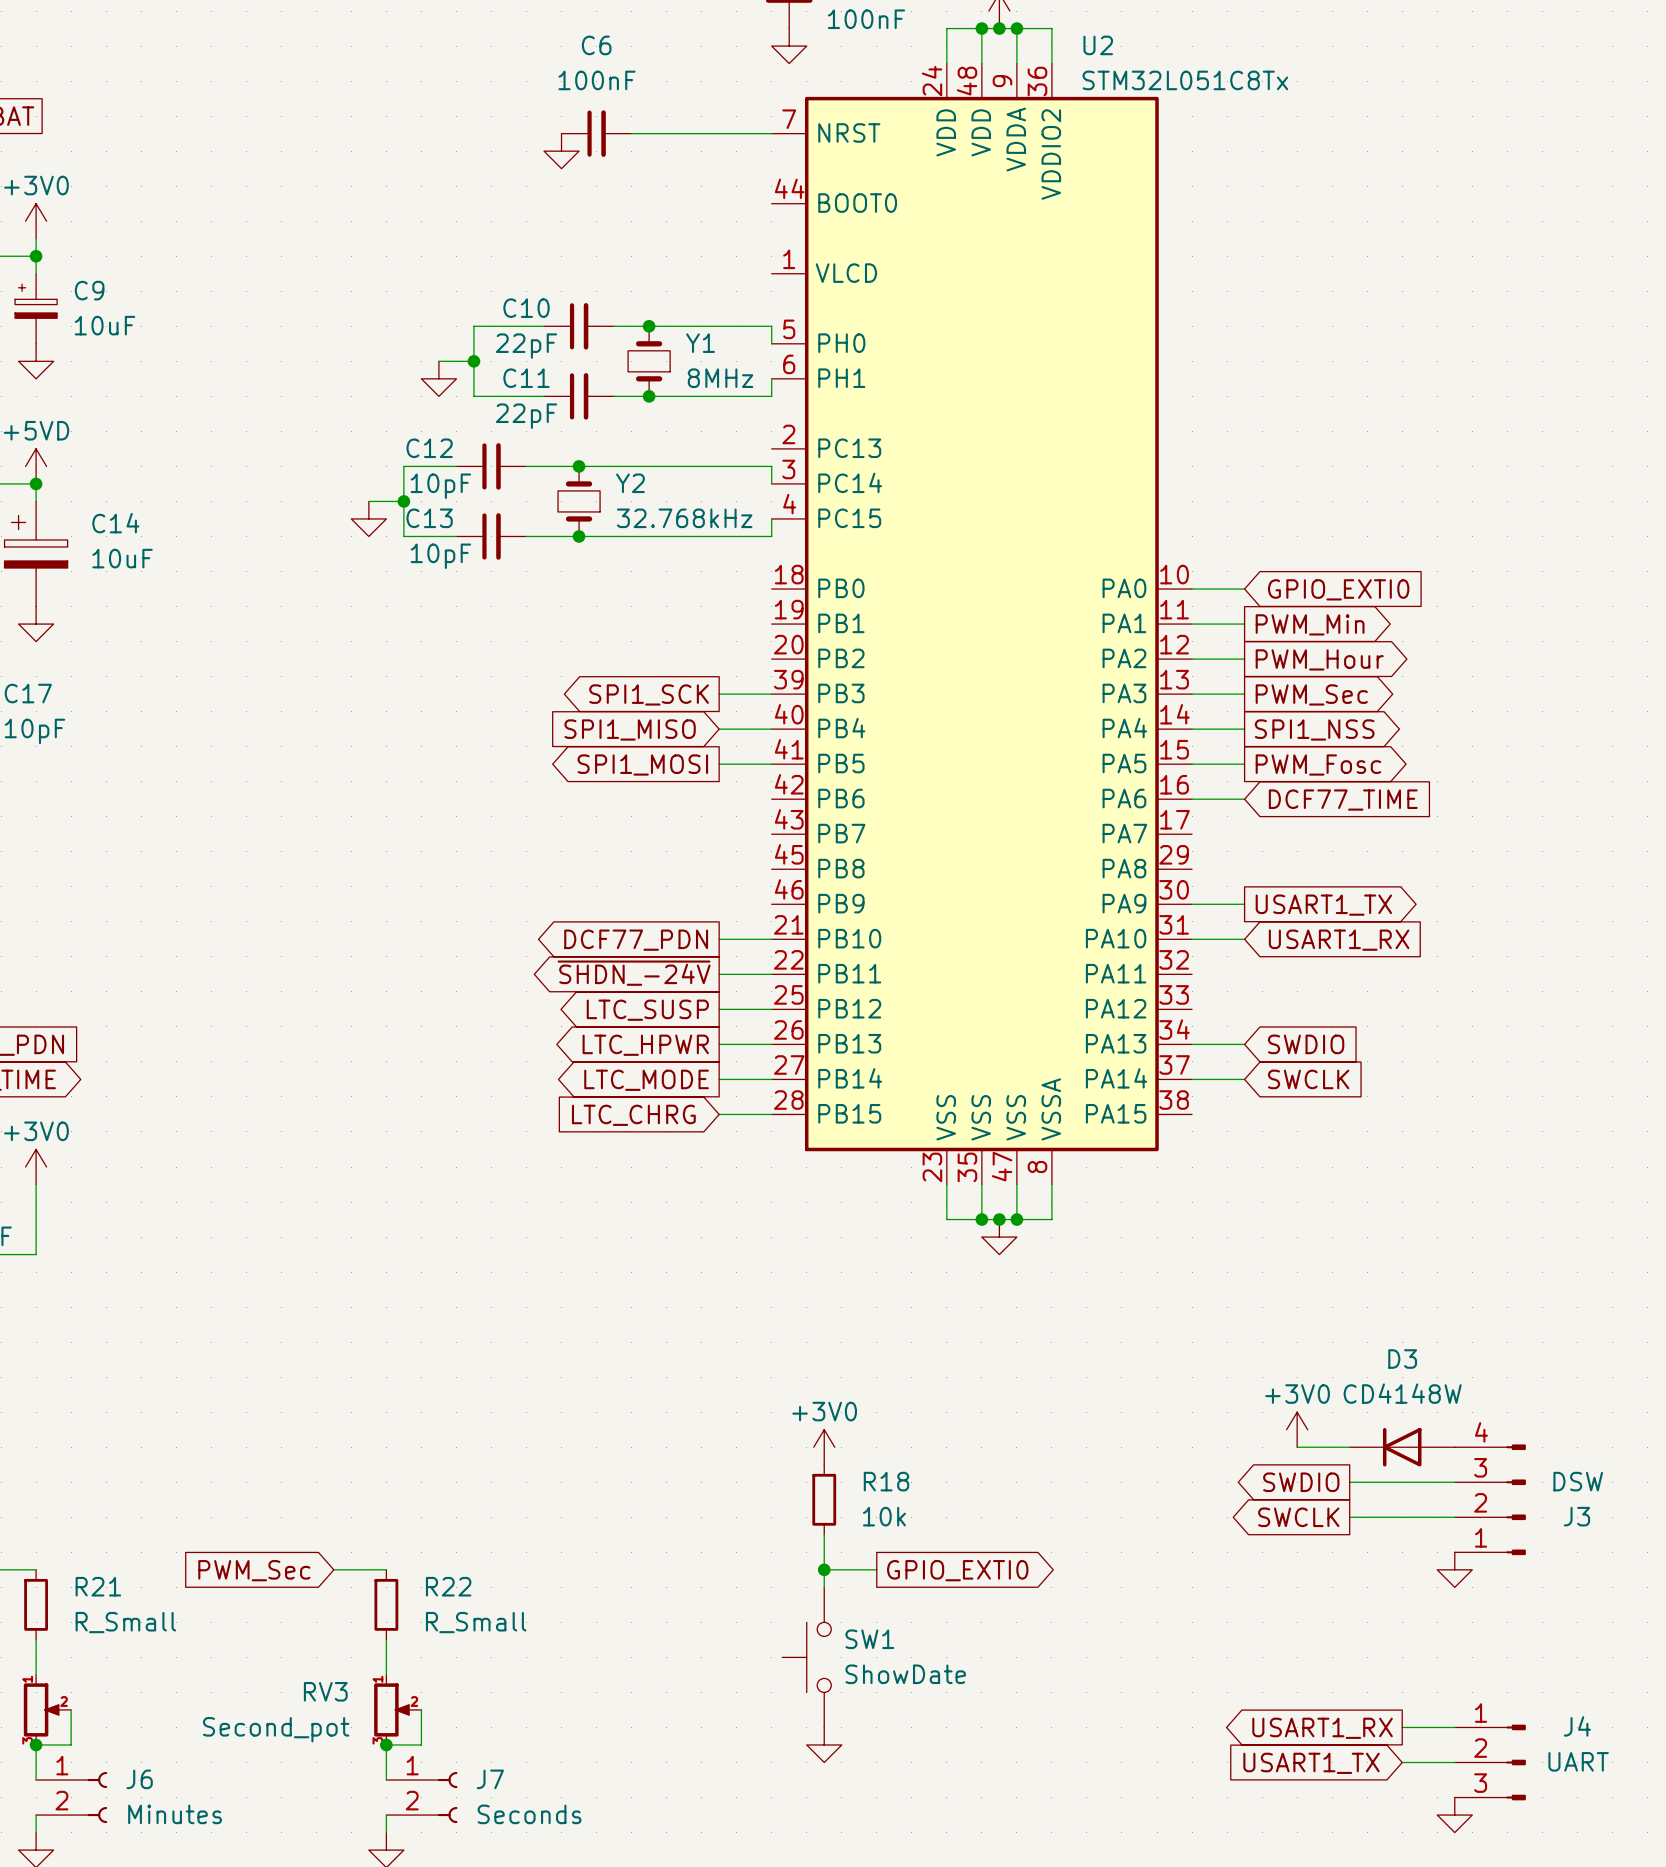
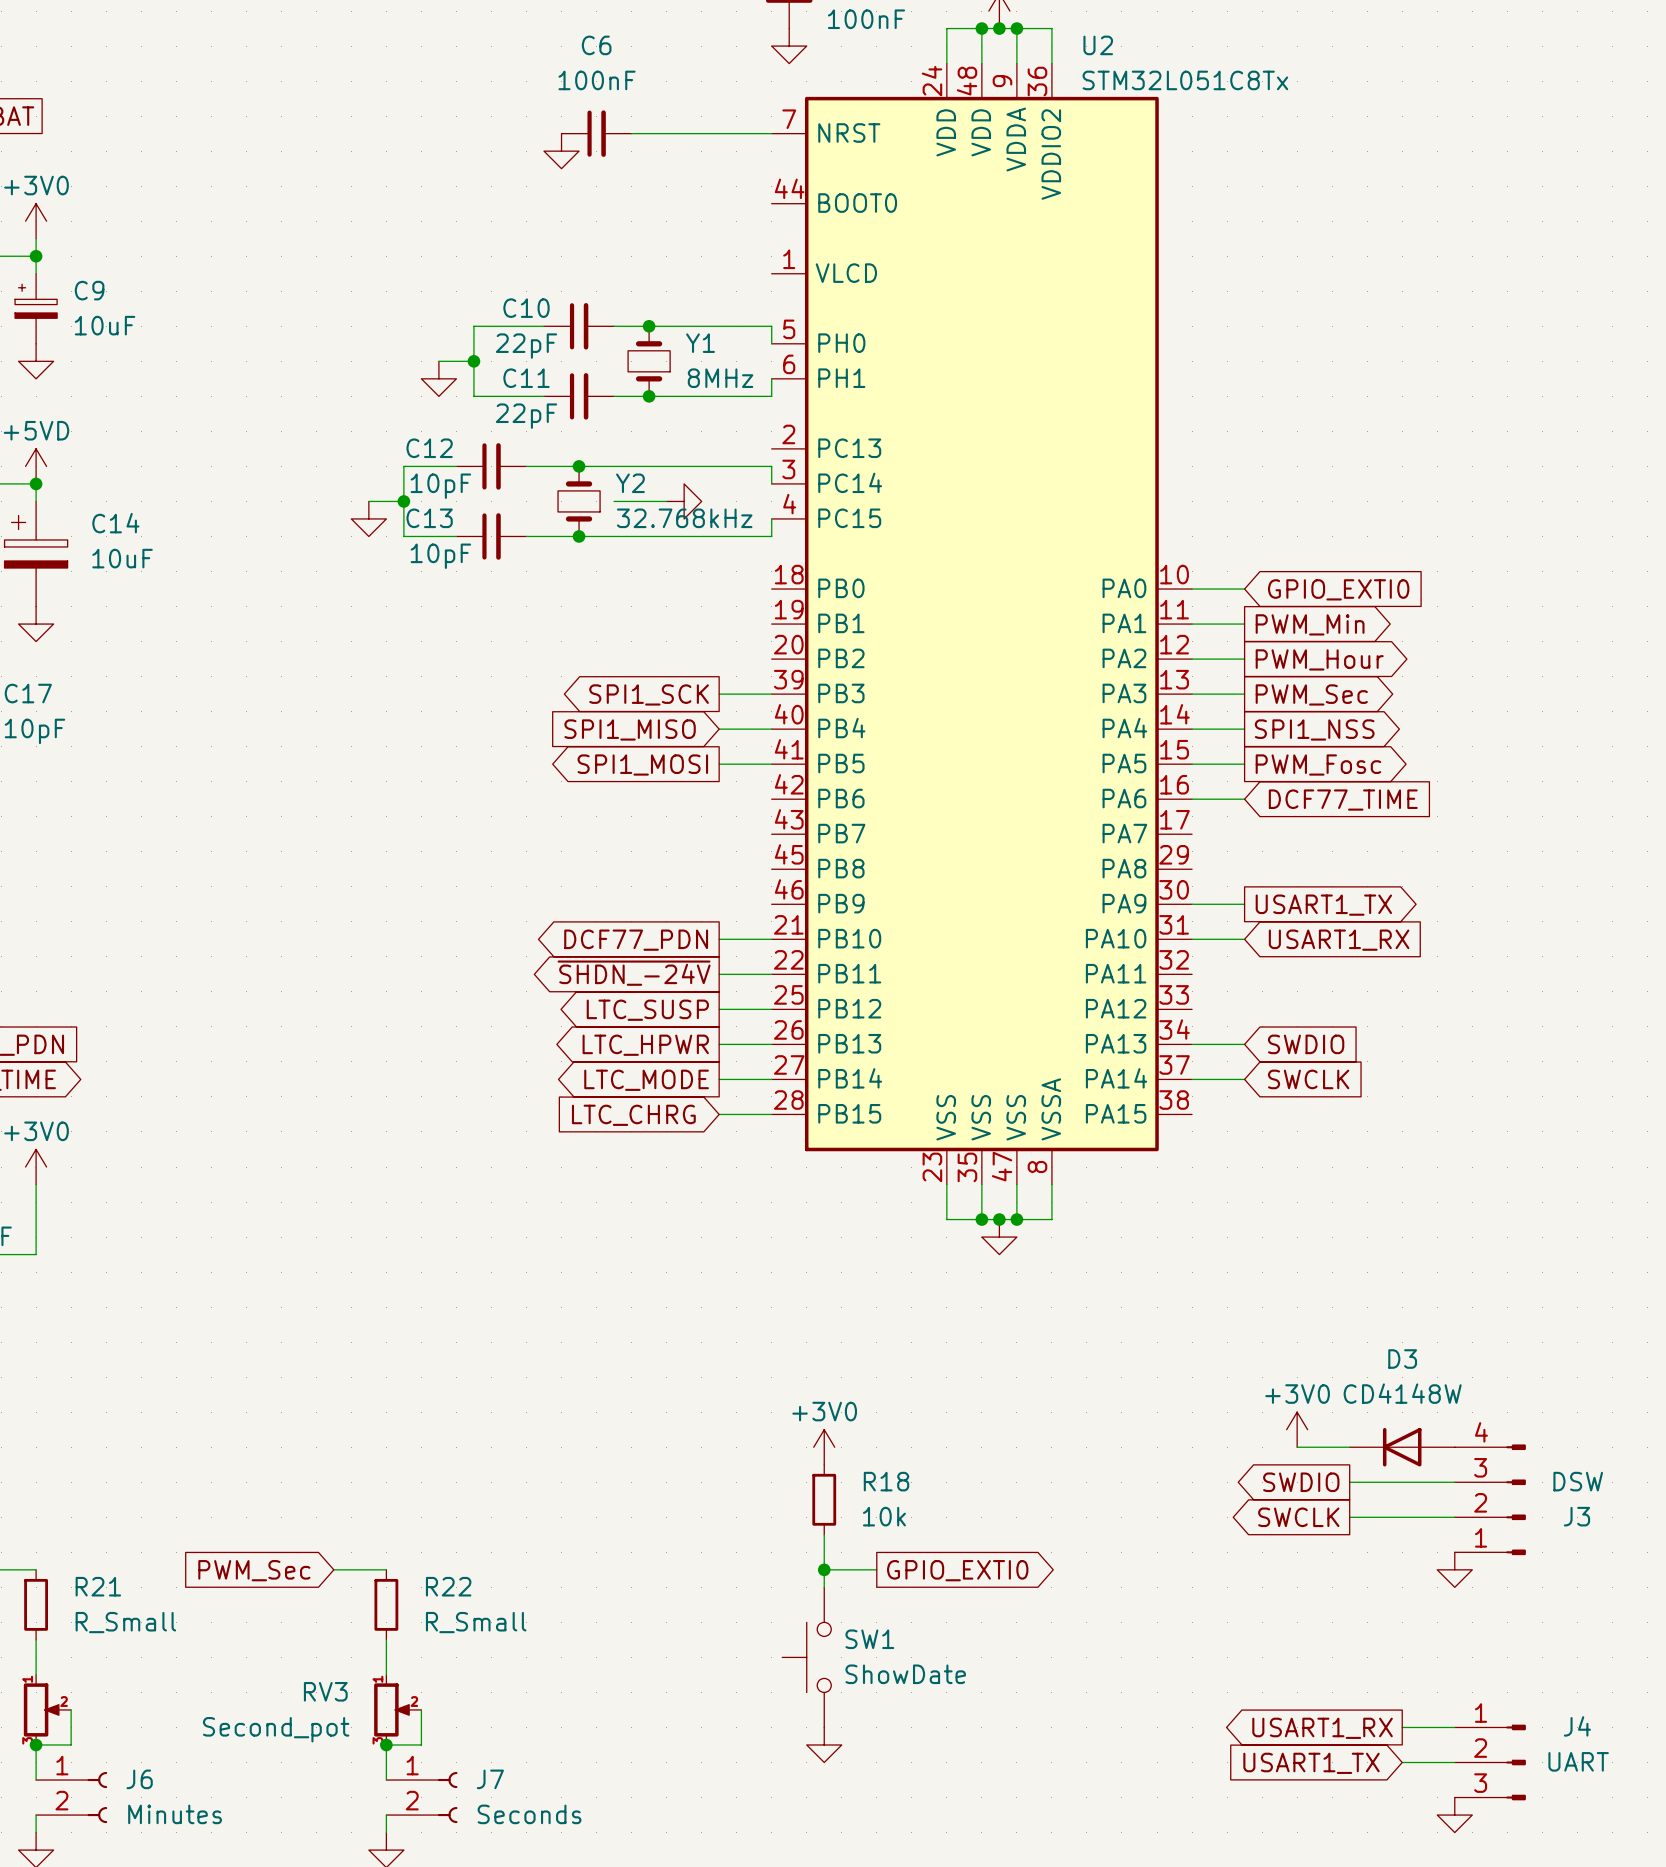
wire: none -> (614, 501) (666, 501)
power symbol: none -> (684, 501)

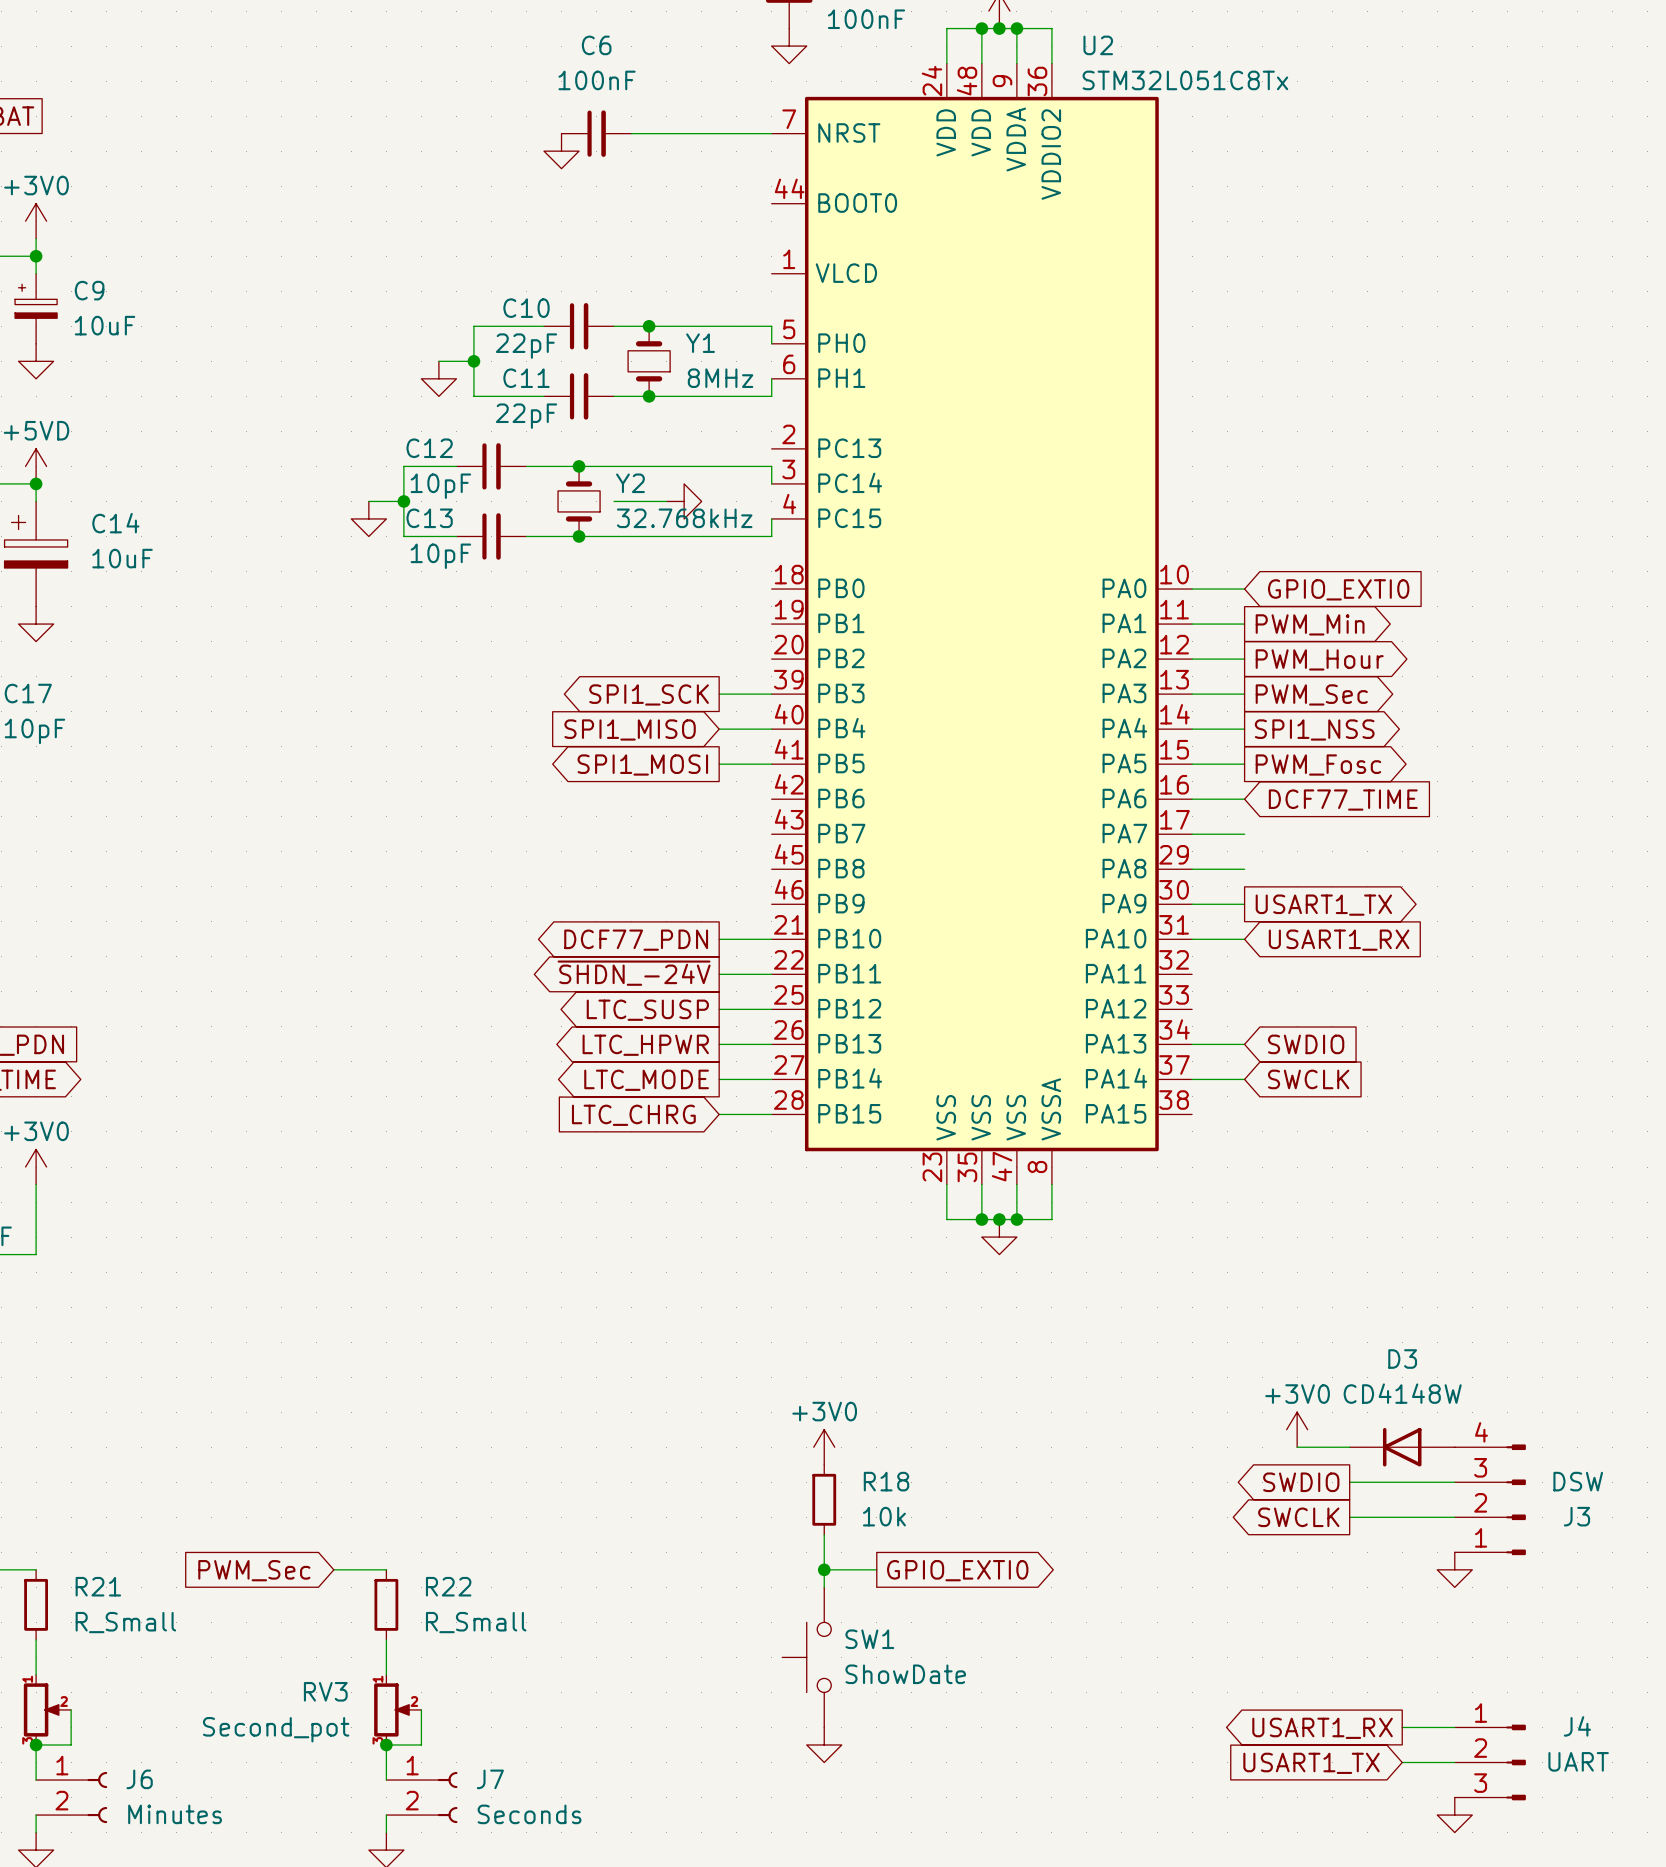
wire: none -> (1192, 834) (1244, 834)
wire: none -> (1192, 869) (1244, 869)

